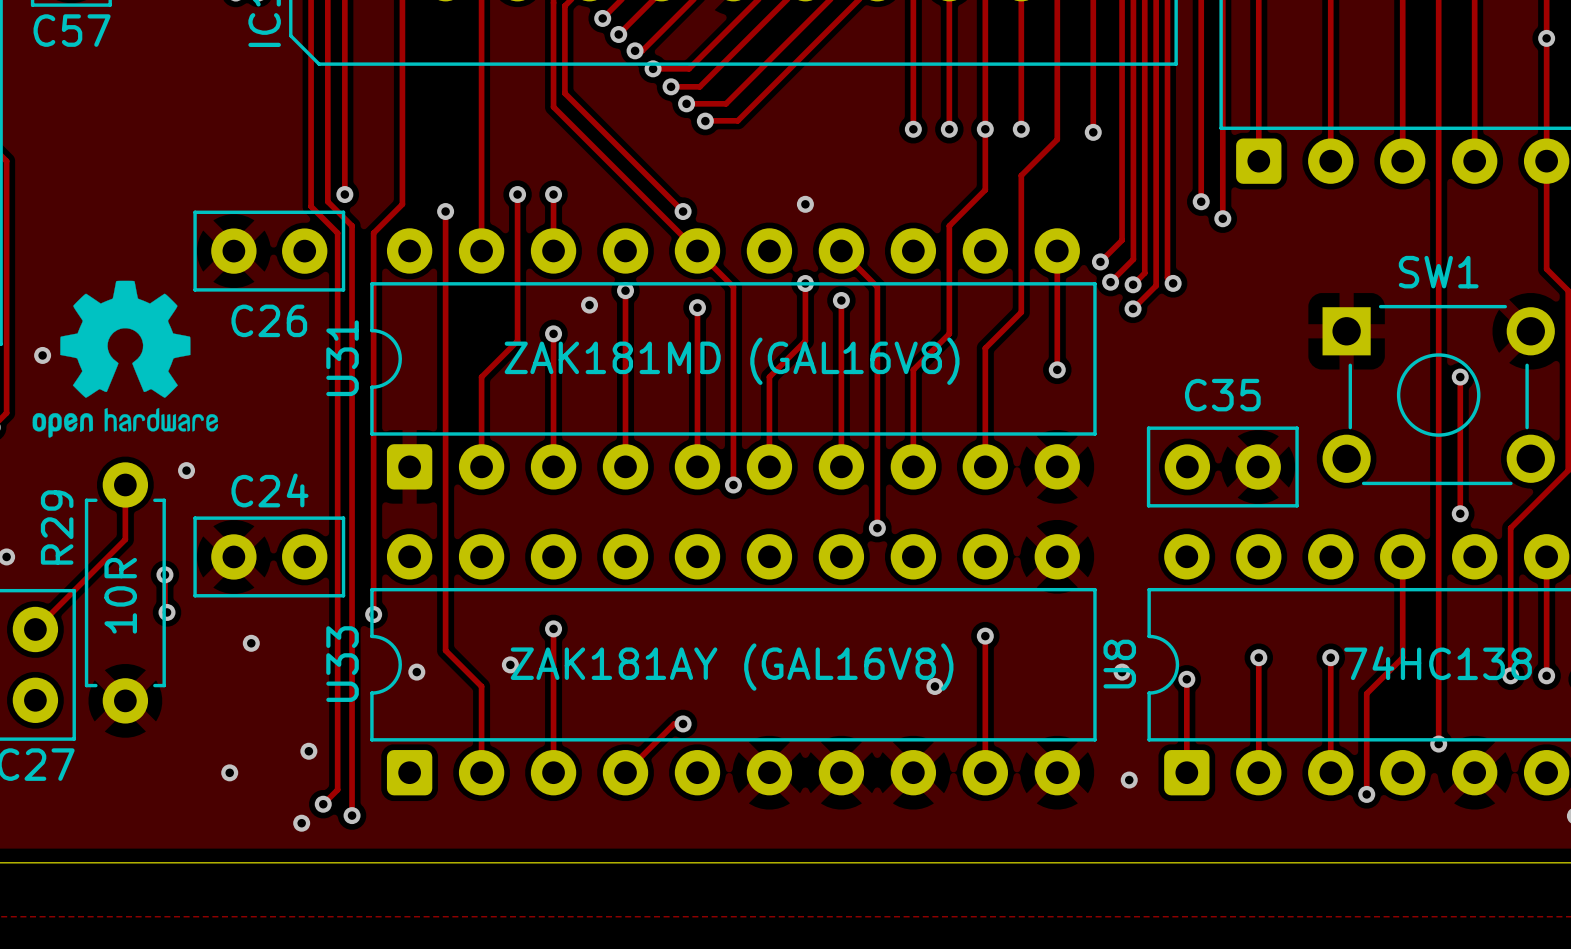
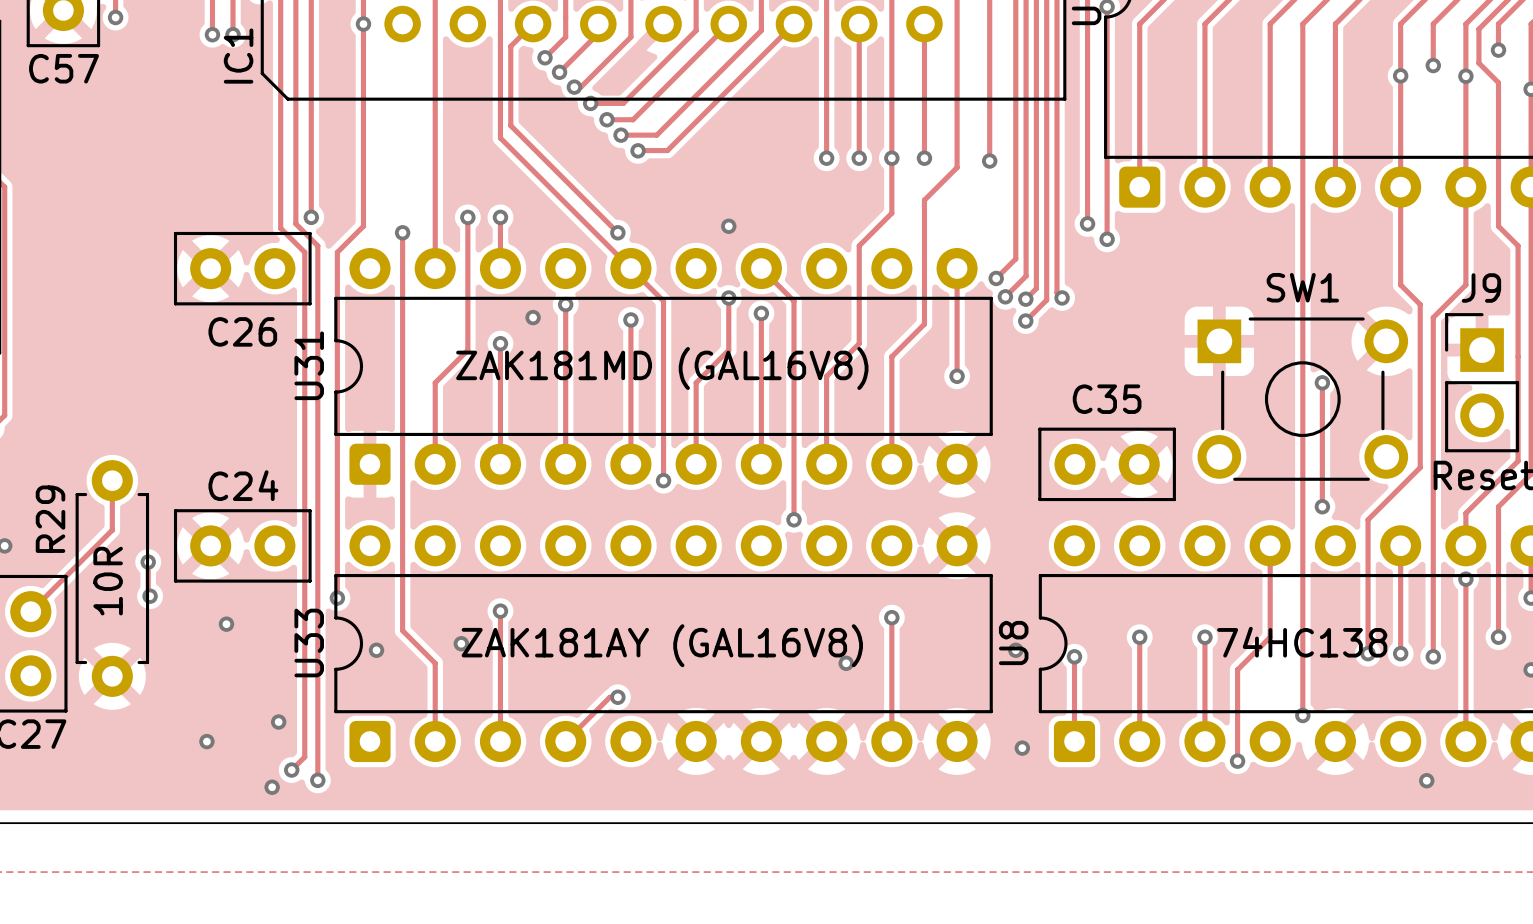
drawing: [32, 280, 219, 438] -> none
via: (42, 355) -> none
via: (186, 470) -> none

